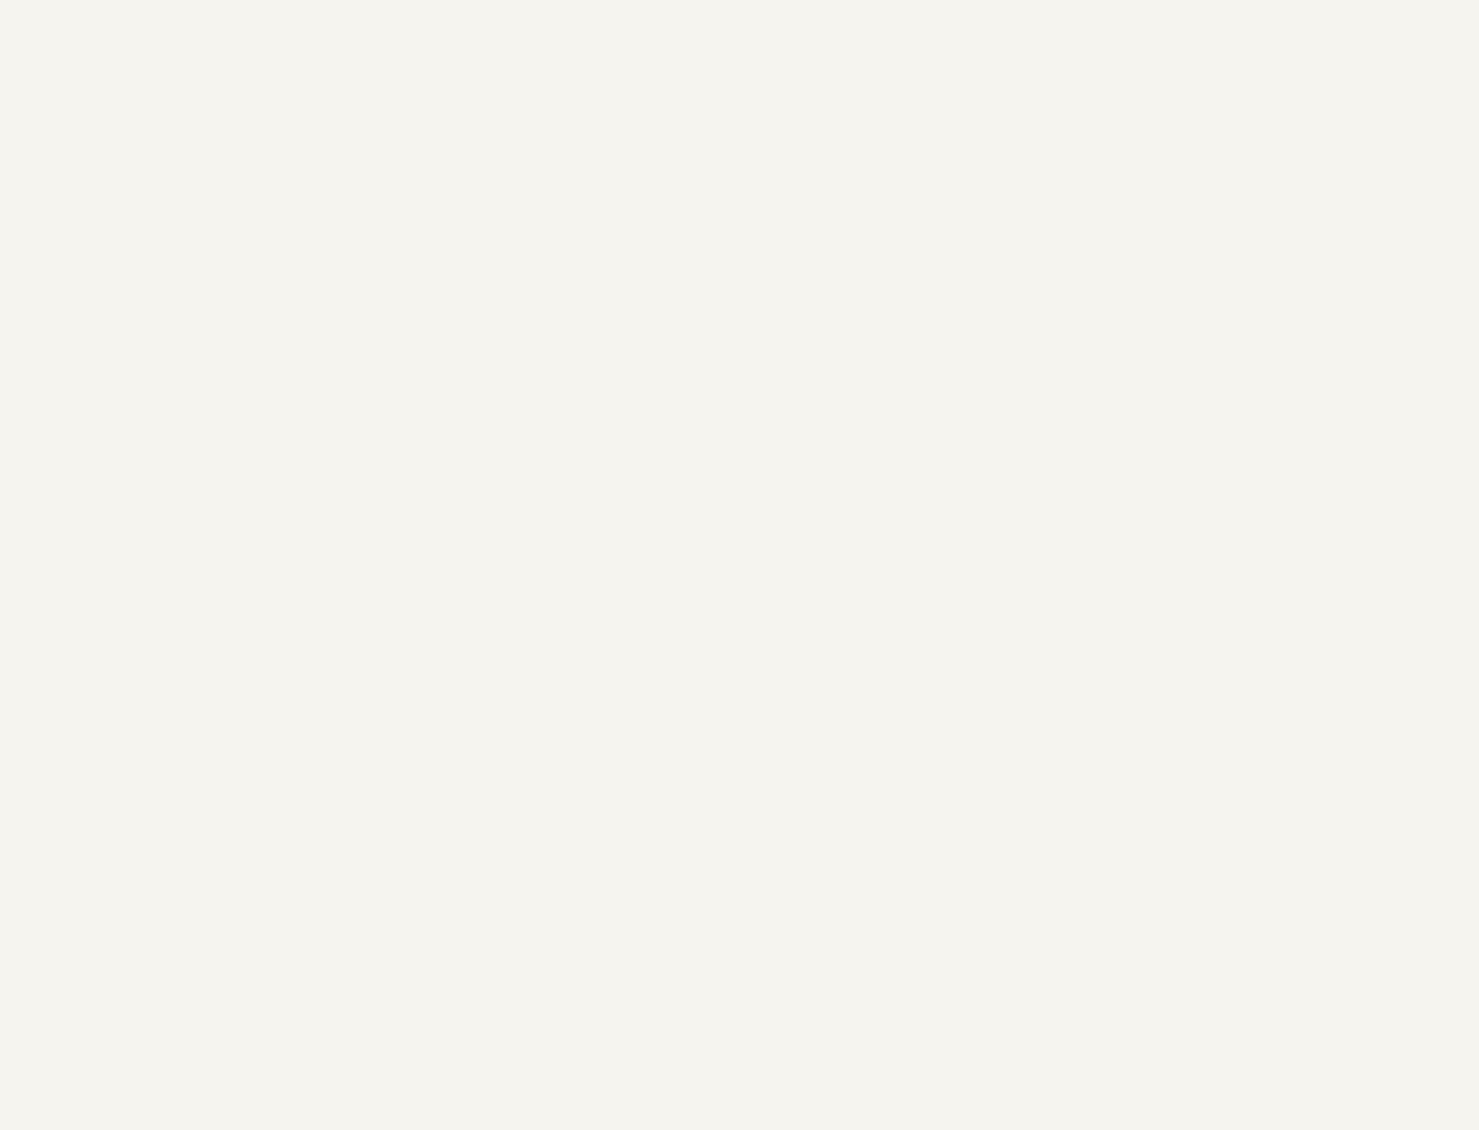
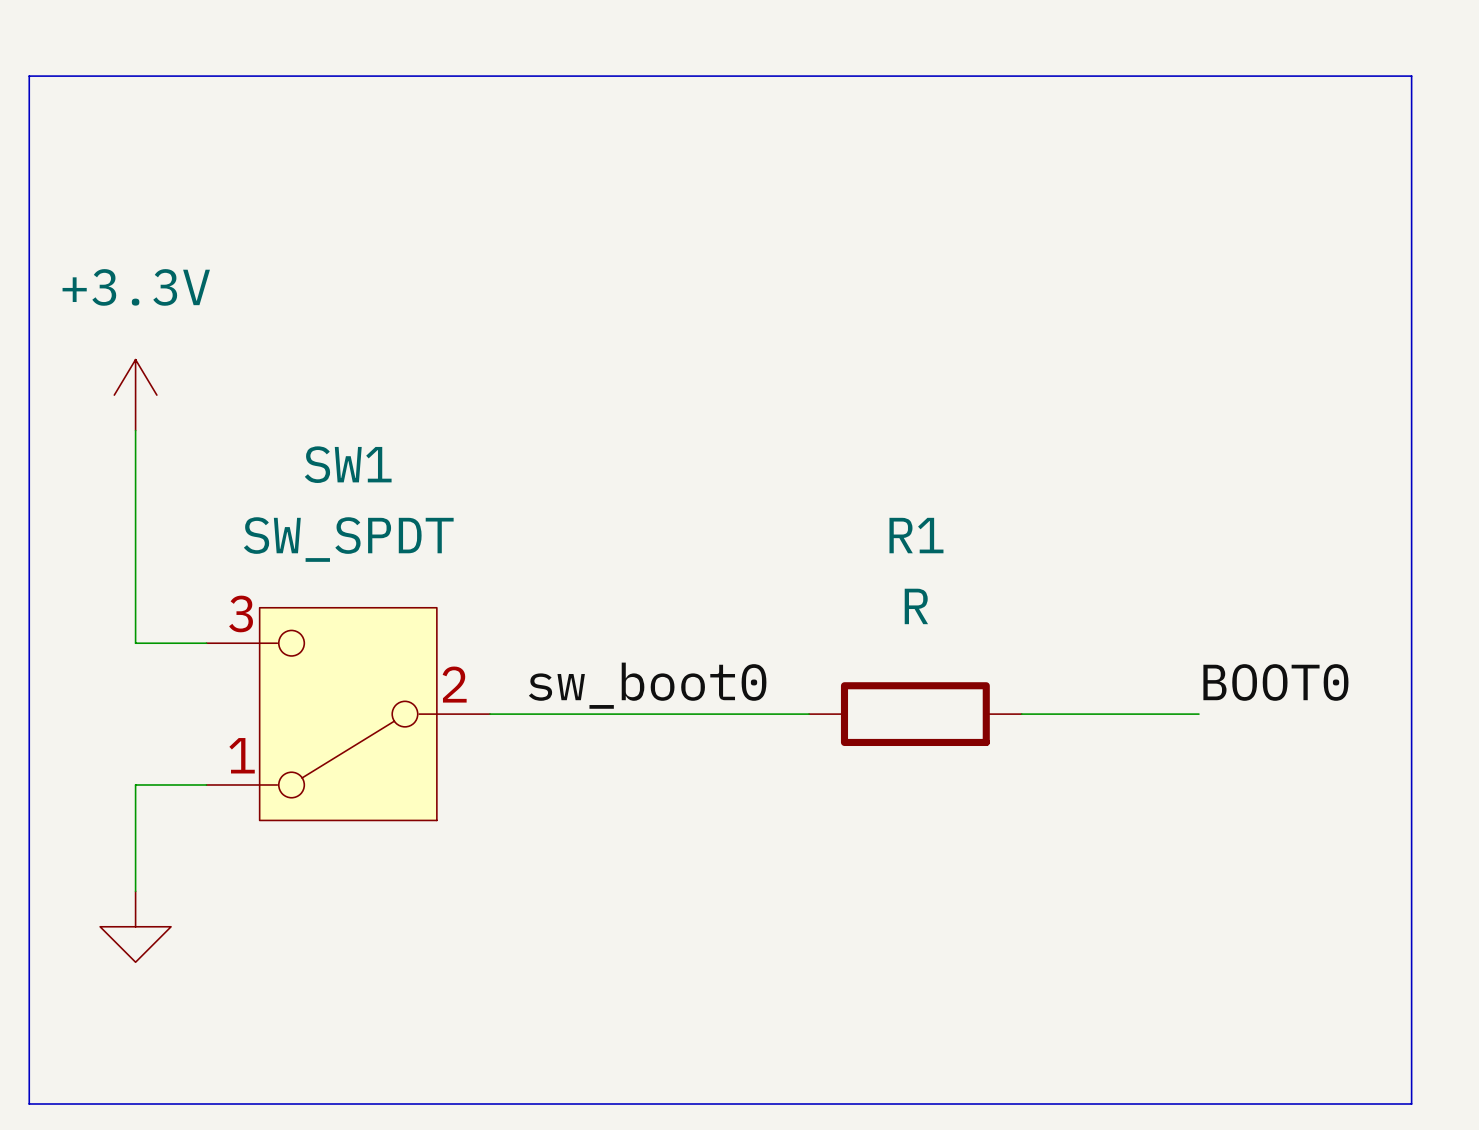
line: none -> (29, 76) (1411, 76) (1411, 1104) (29, 1104) (29, 76)
power symbol: none -> +3.3V (135, 395)
wire: none -> (135, 430) (135, 643) (206, 643)
label: none -> BOOT0 (1275, 682)
label: none -> sw_boot0 (647, 685)
SW1: none -> SW_SPDT (348, 714)
wire: none -> (490, 714) (809, 714)
R1: none -> R (915, 714)
wire: none -> (1021, 714) (1198, 714)
wire: none -> (206, 784) (135, 784) (135, 891)
power symbol: none -> (135, 926)

